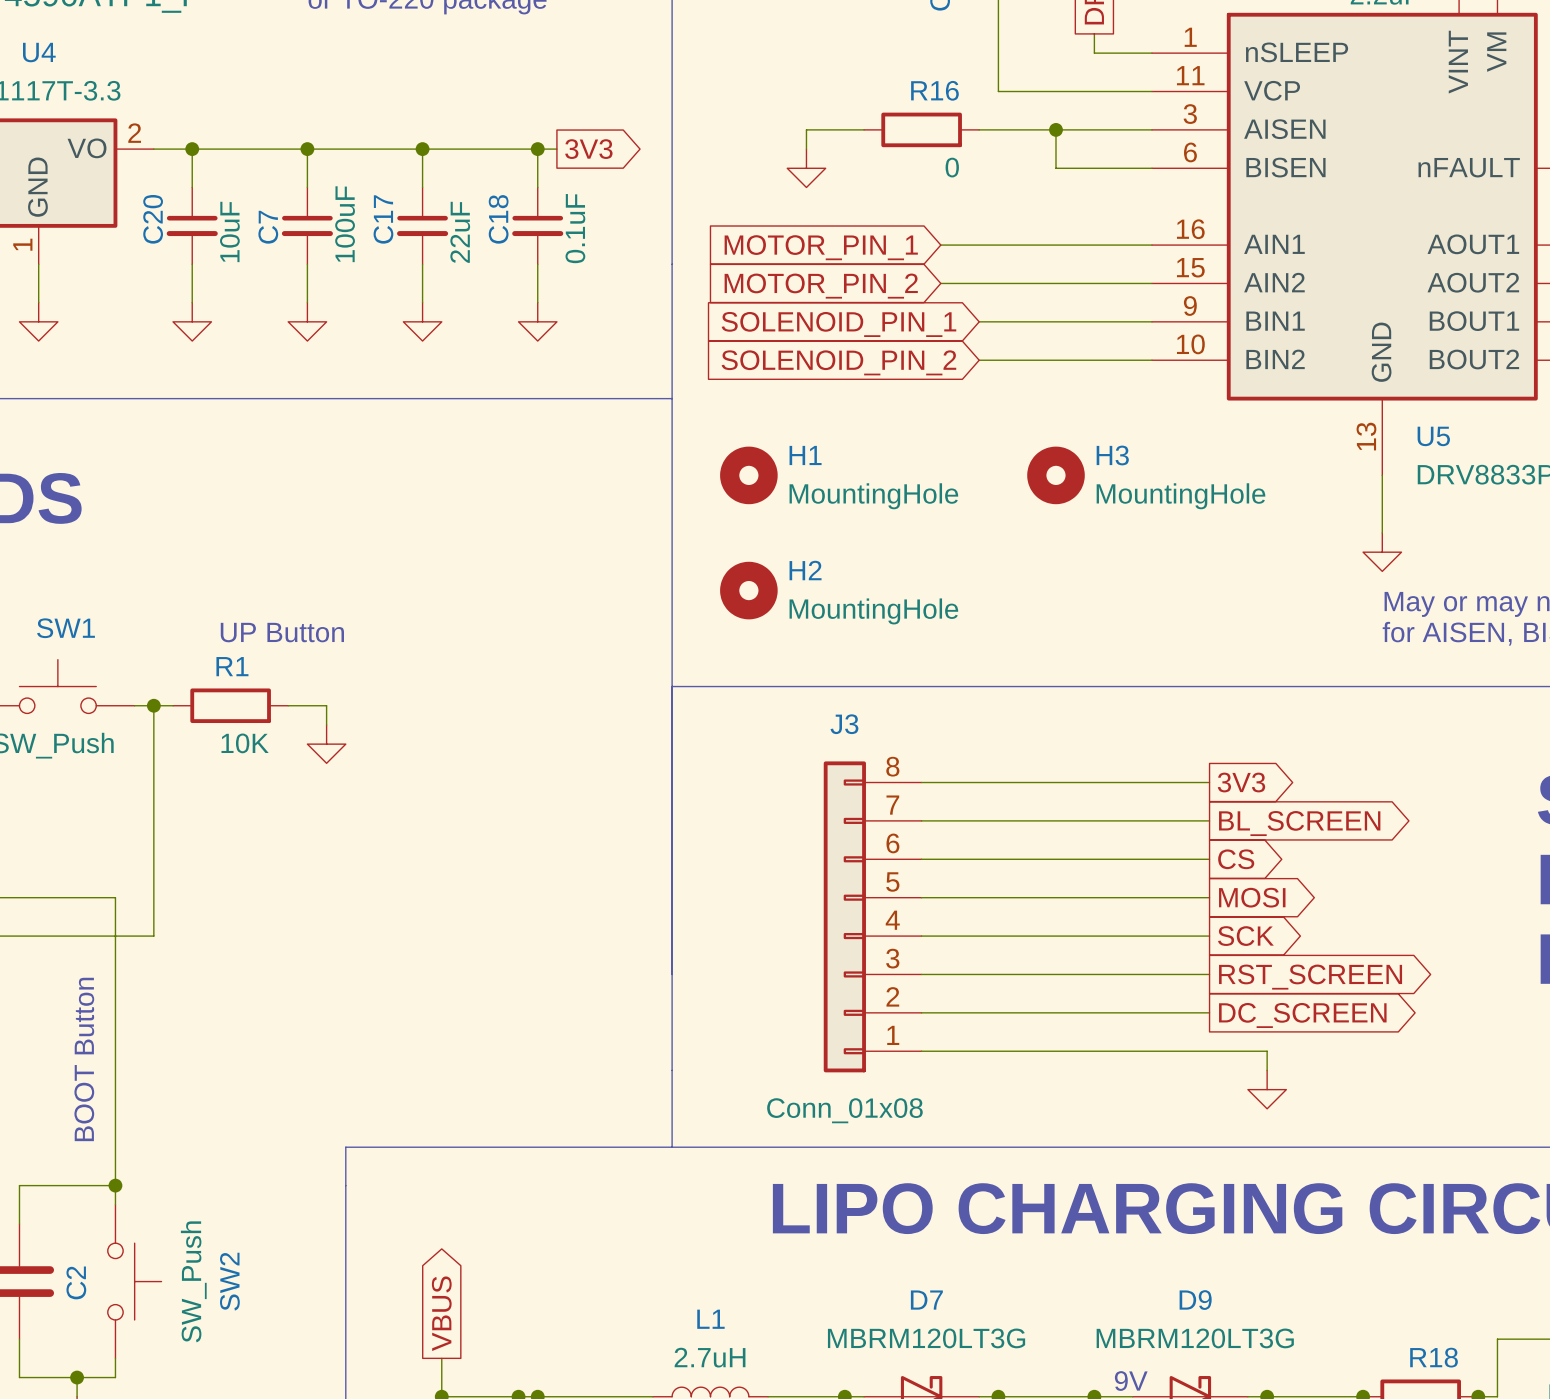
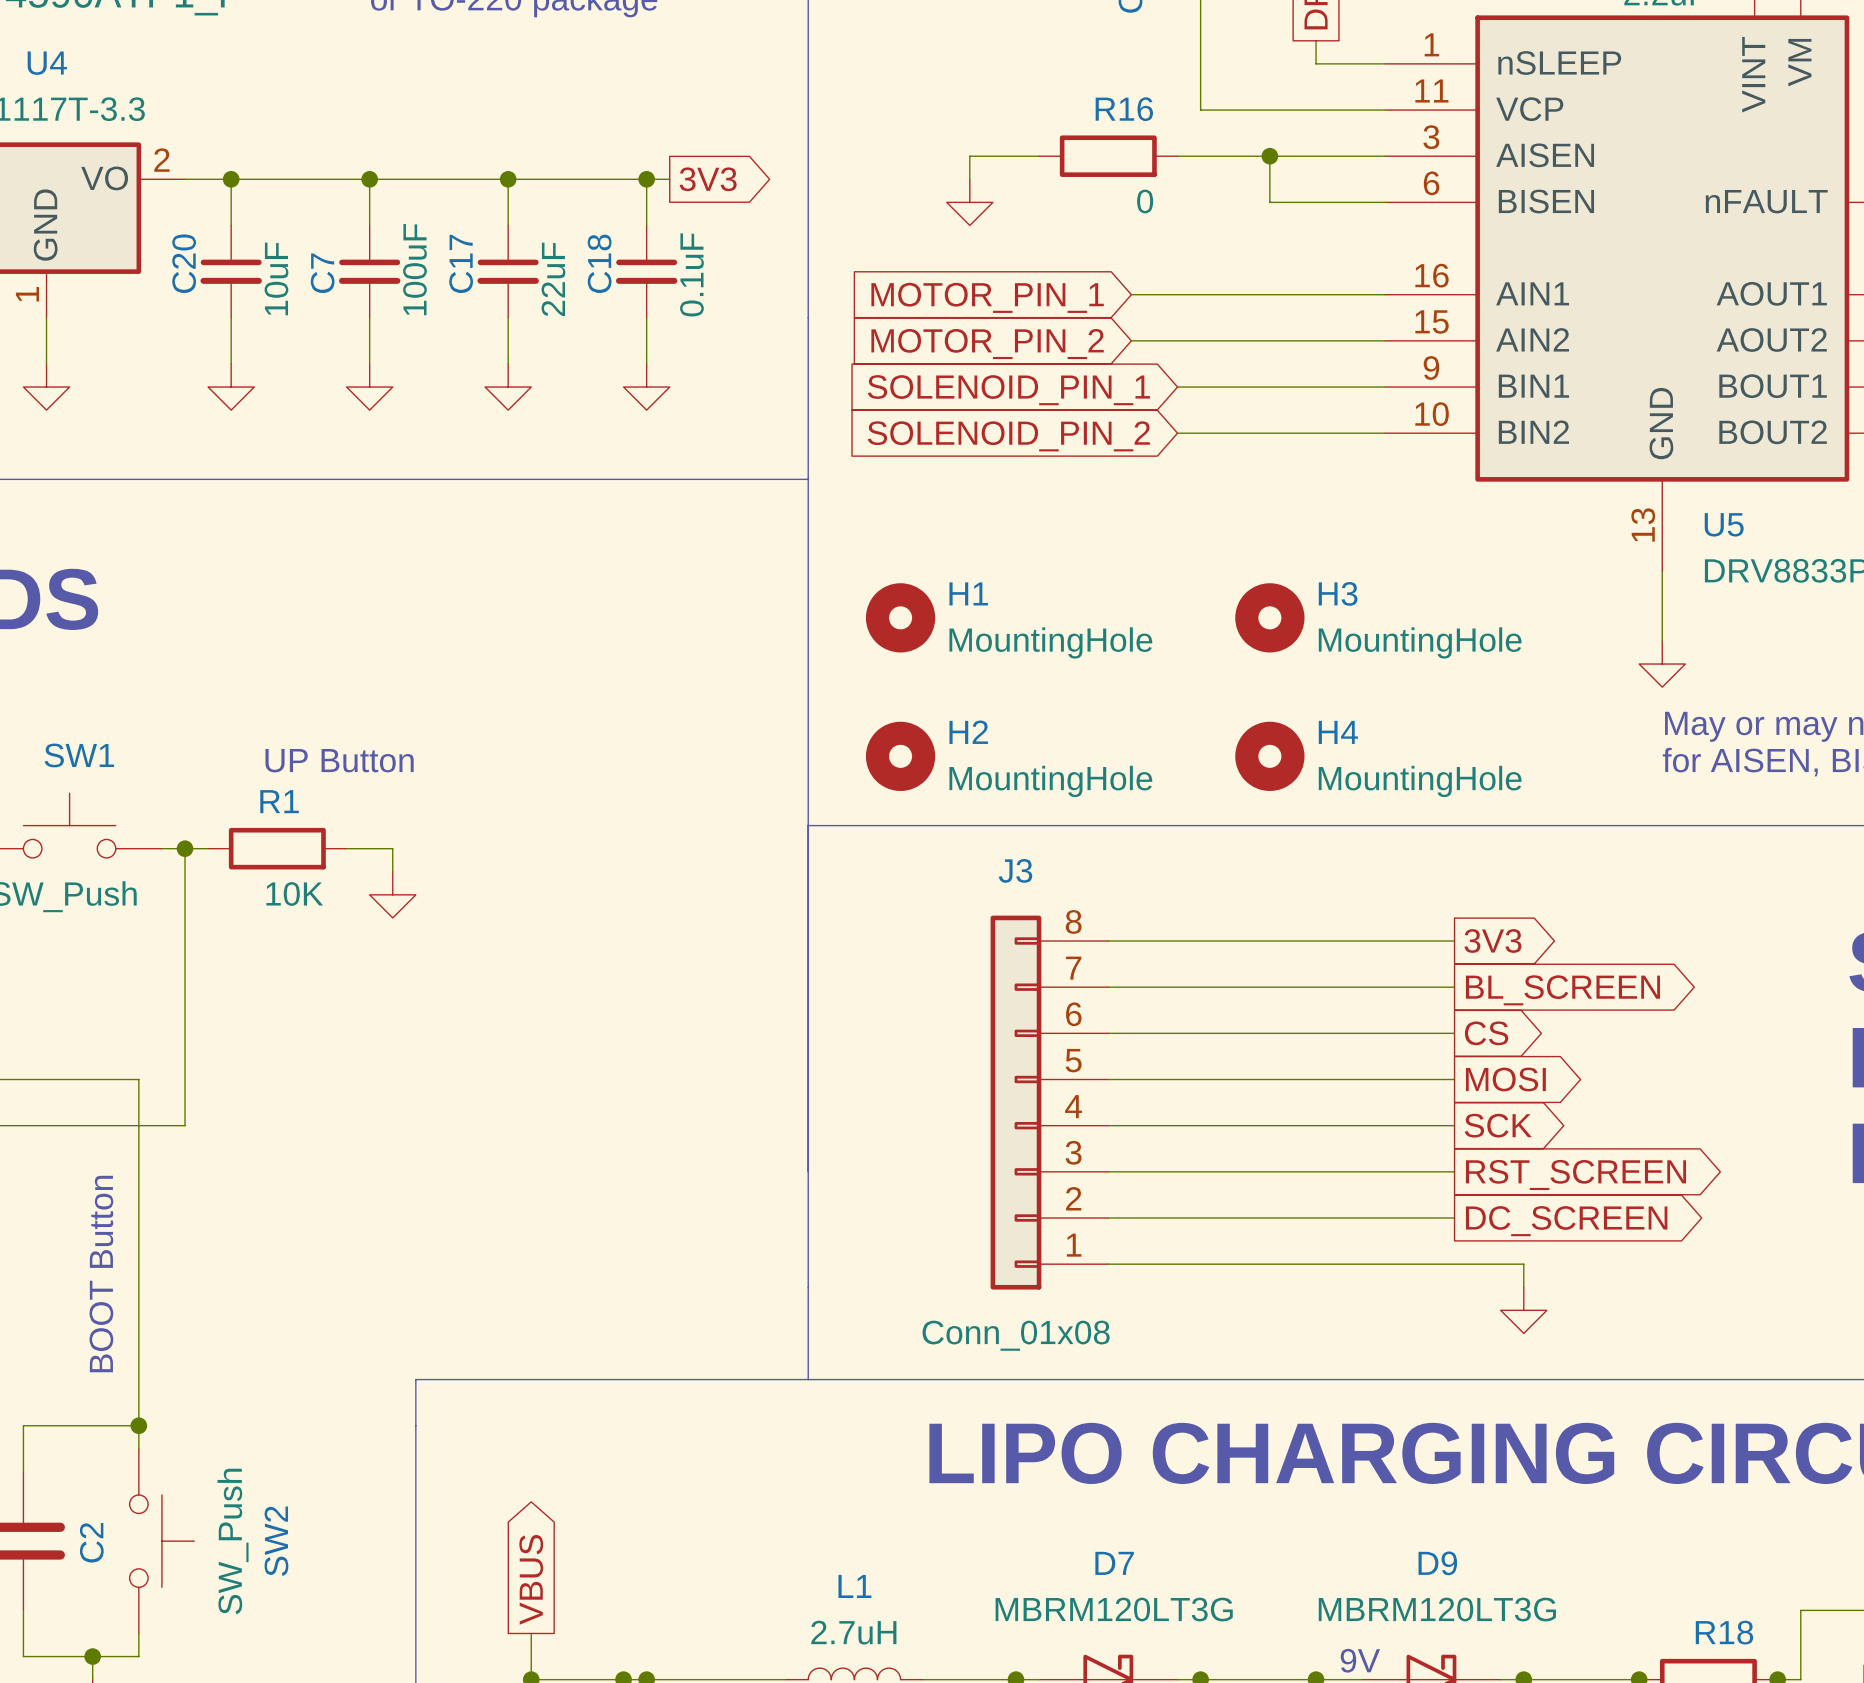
H1 position: (748, 475) -> (900, 617)
H3 position: (1055, 475) -> (1269, 617)
H2 position: (748, 590) -> (900, 756)
H4: none -> MountingHole (1269, 756)

